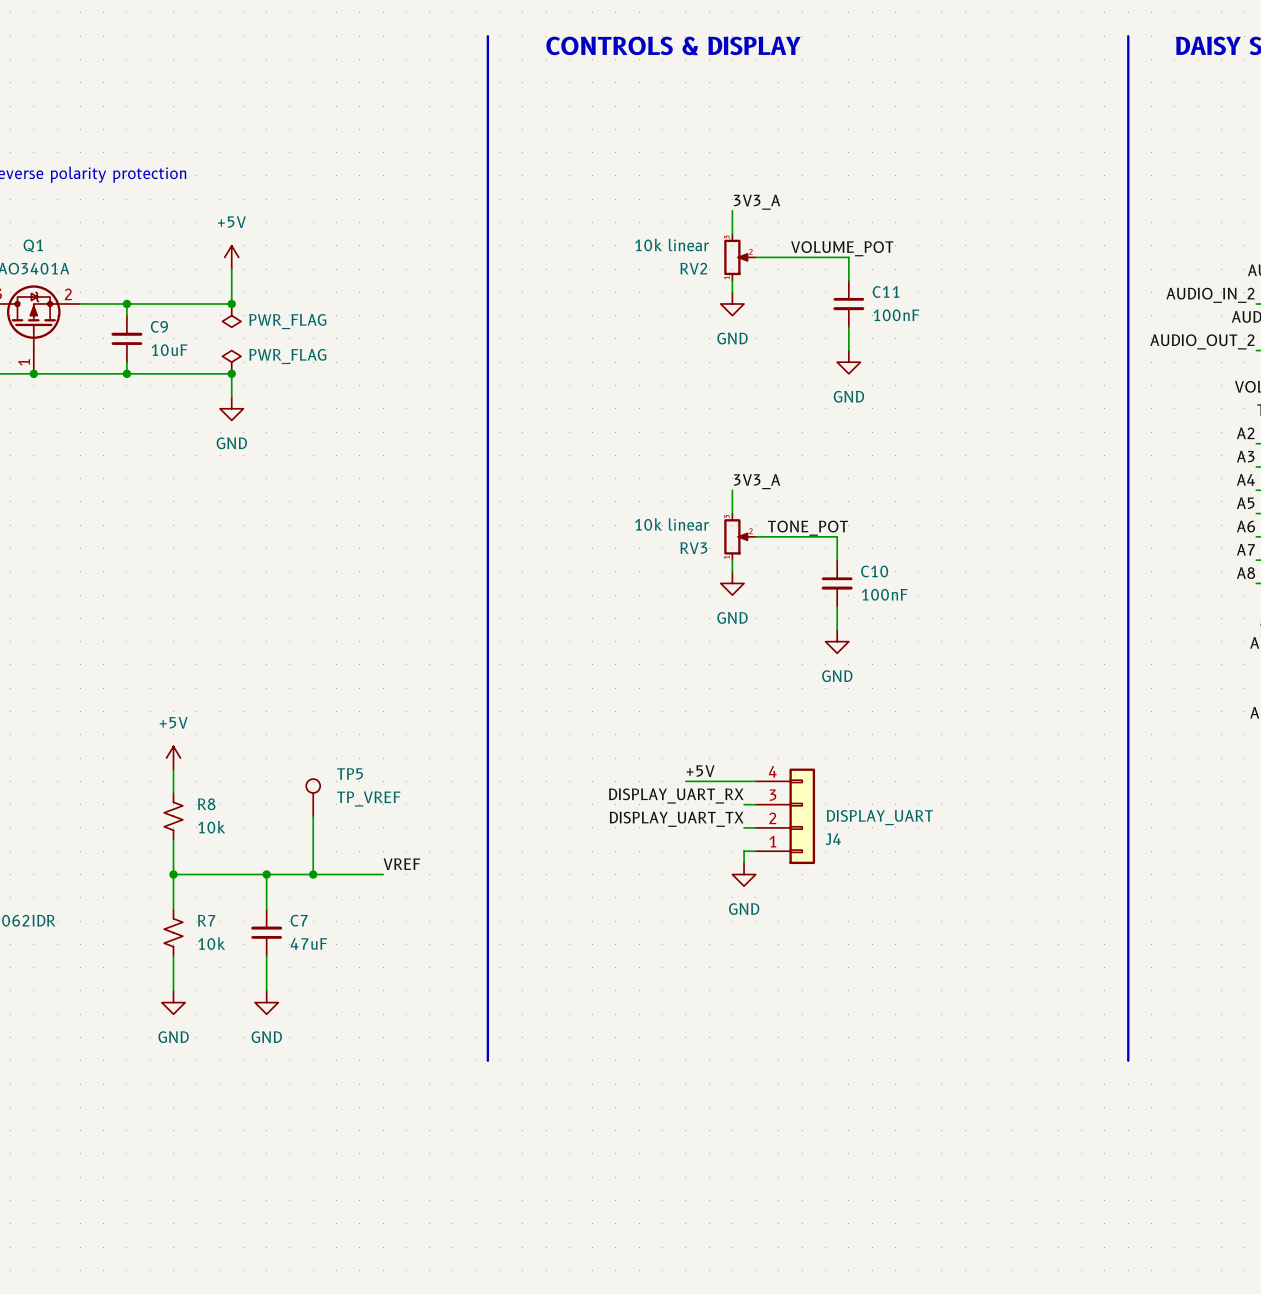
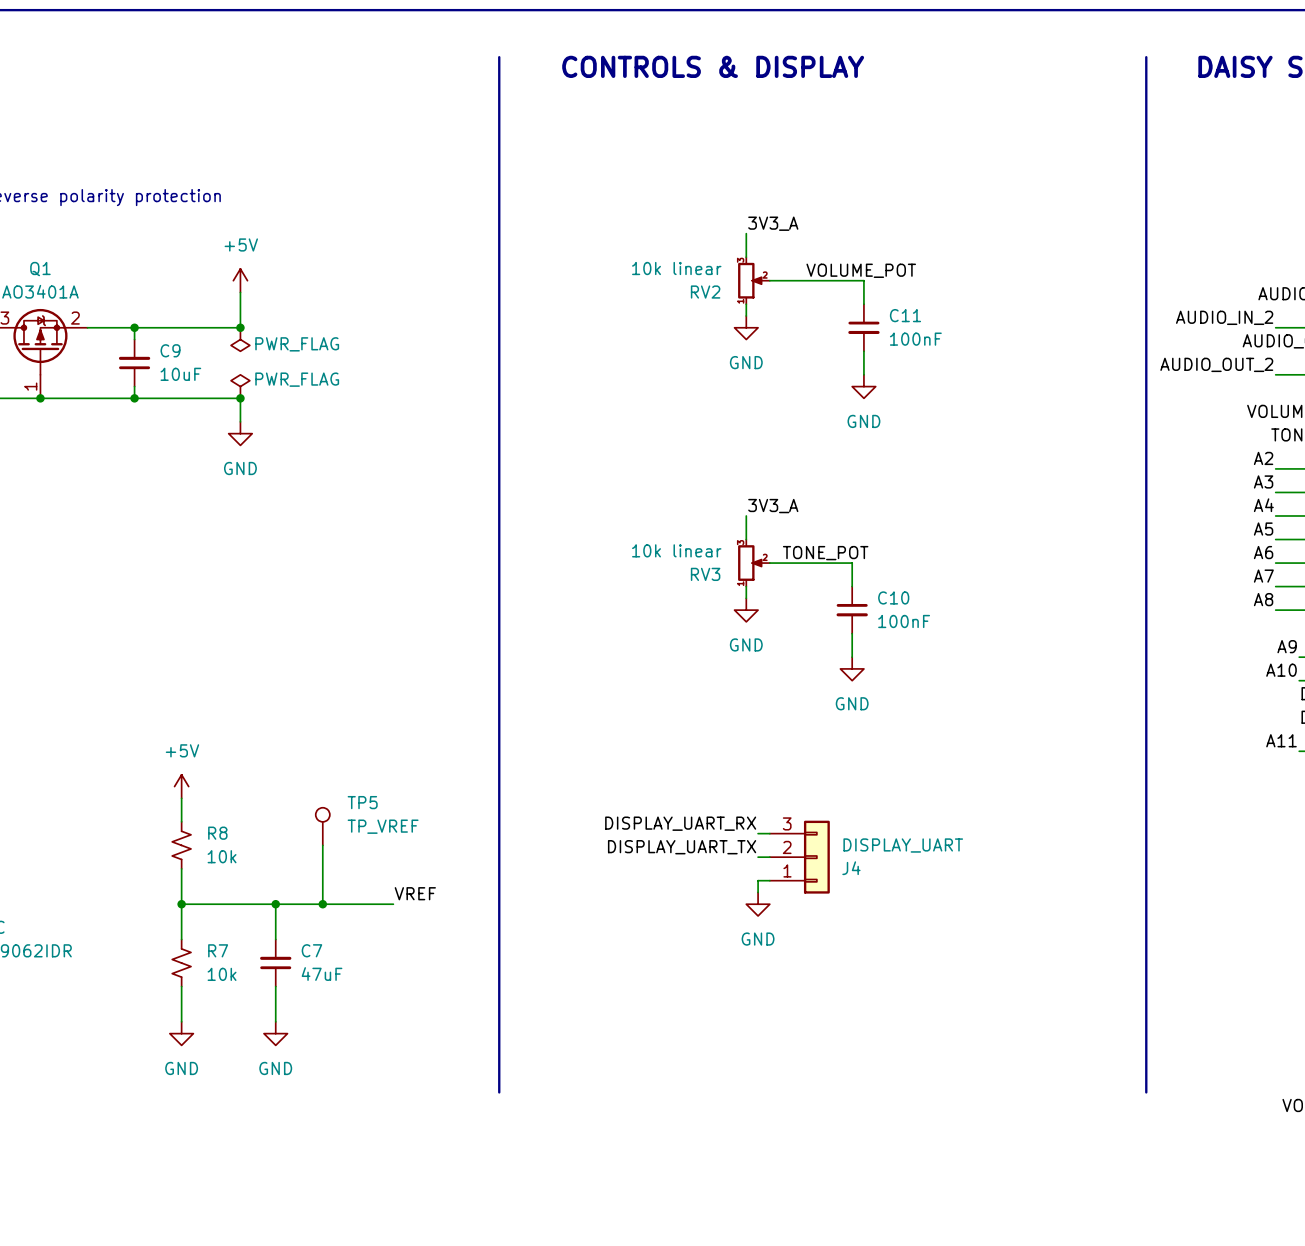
J4 symbol: [755, 768, 816, 865] -> [769, 820, 830, 894]
label: +5V (700, 771) -> none
wire: (685, 781) (755, 781) -> none

